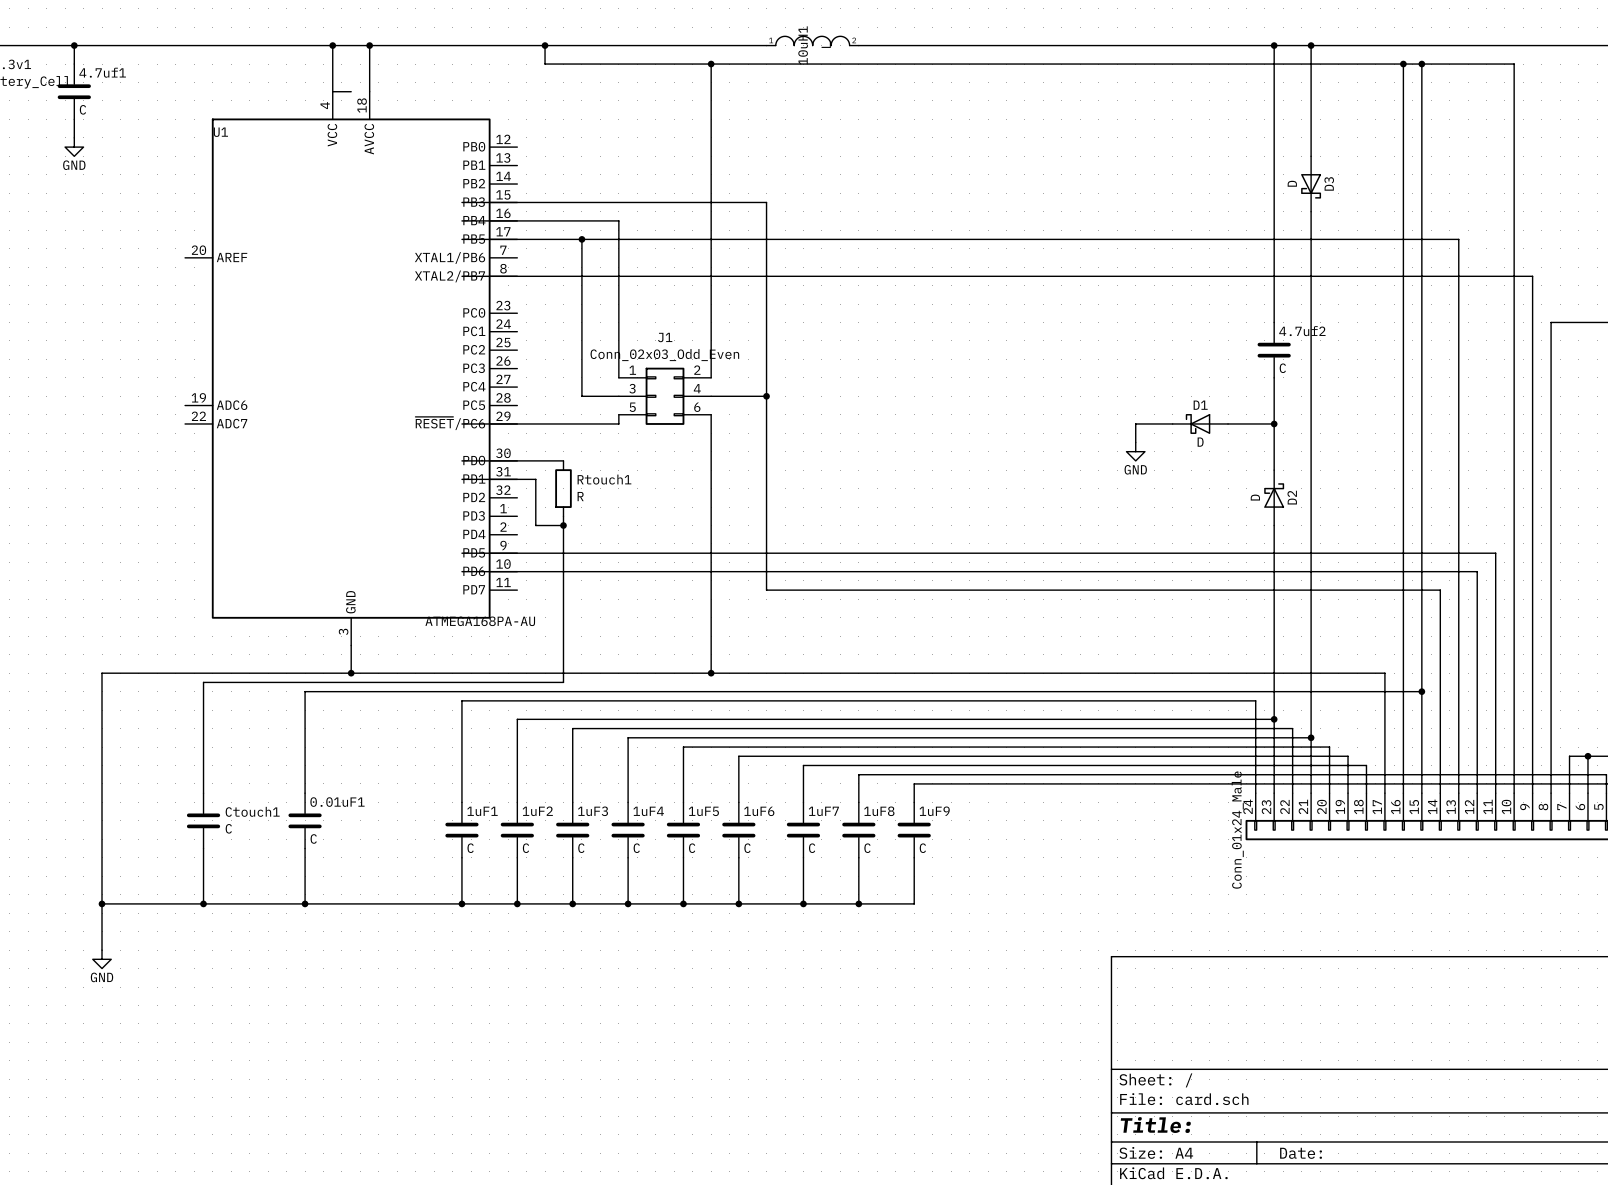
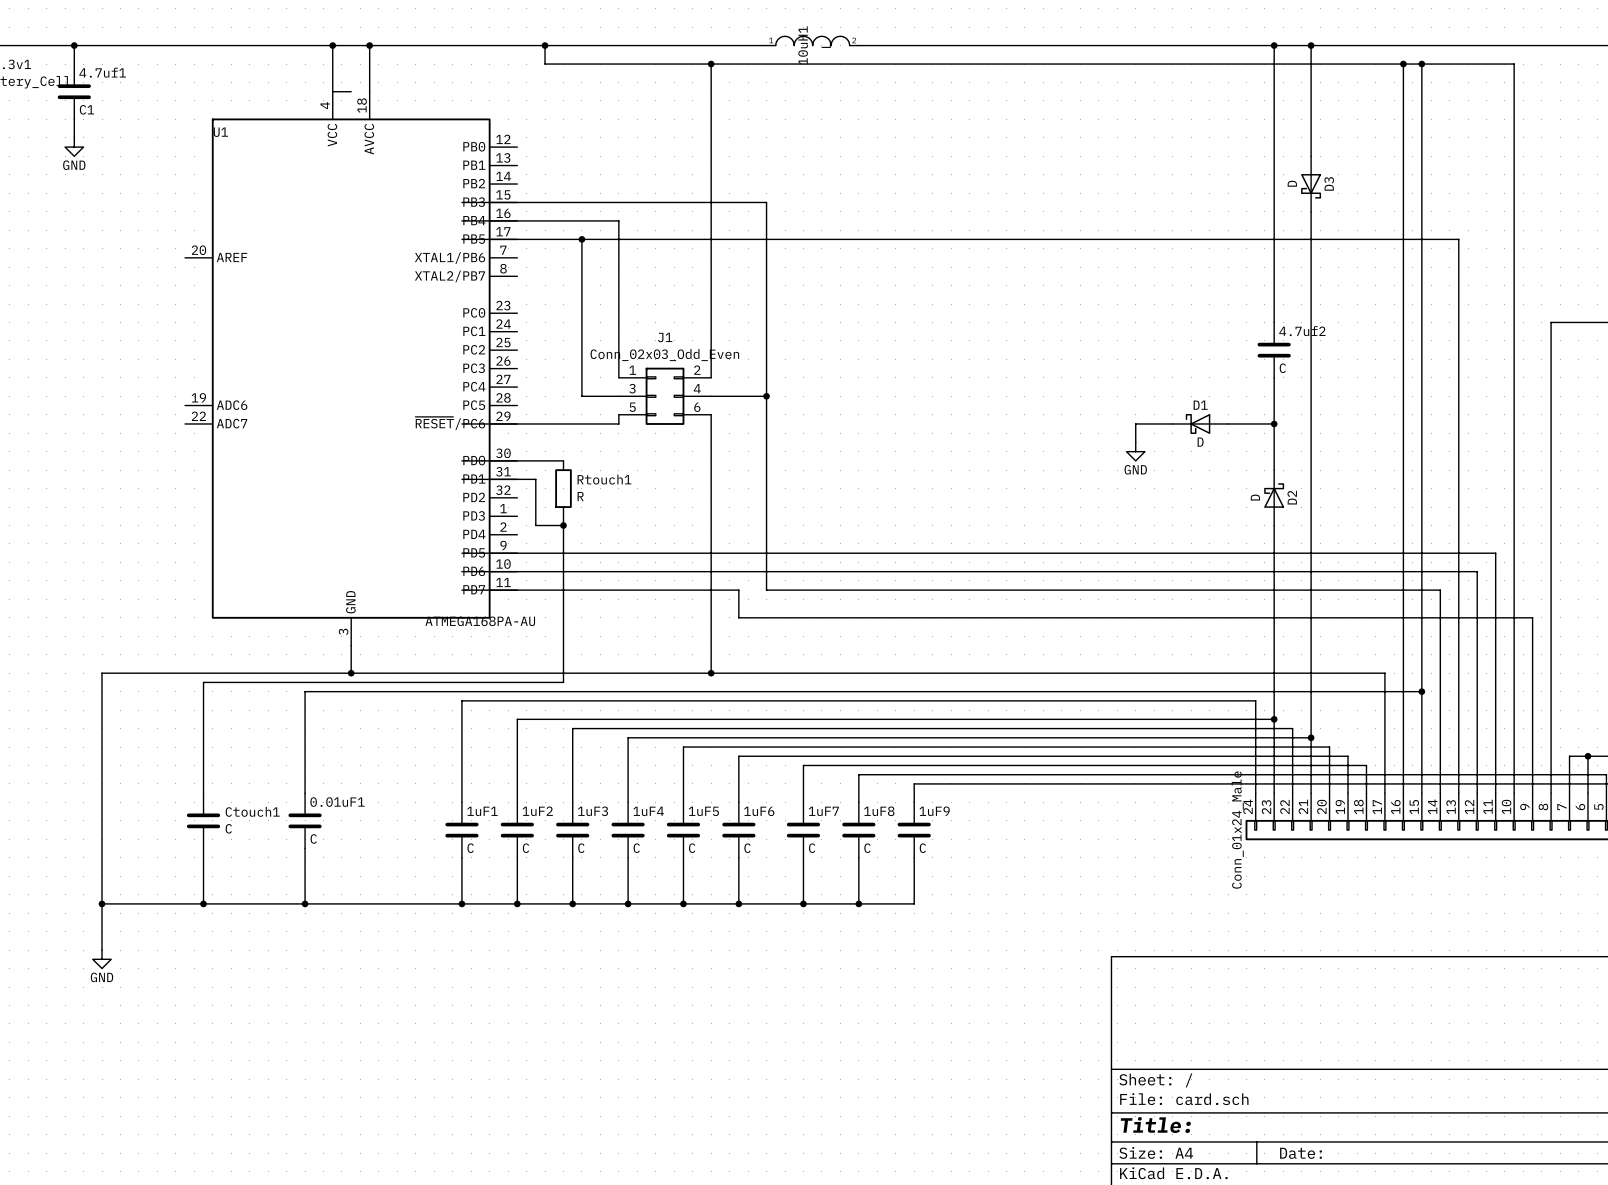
C name: C (82, 109) -> C1 (87, 109)
wire: (461, 276) (1532, 276) (1532, 617) -> (461, 590) (738, 590) (738, 617) (1532, 617)

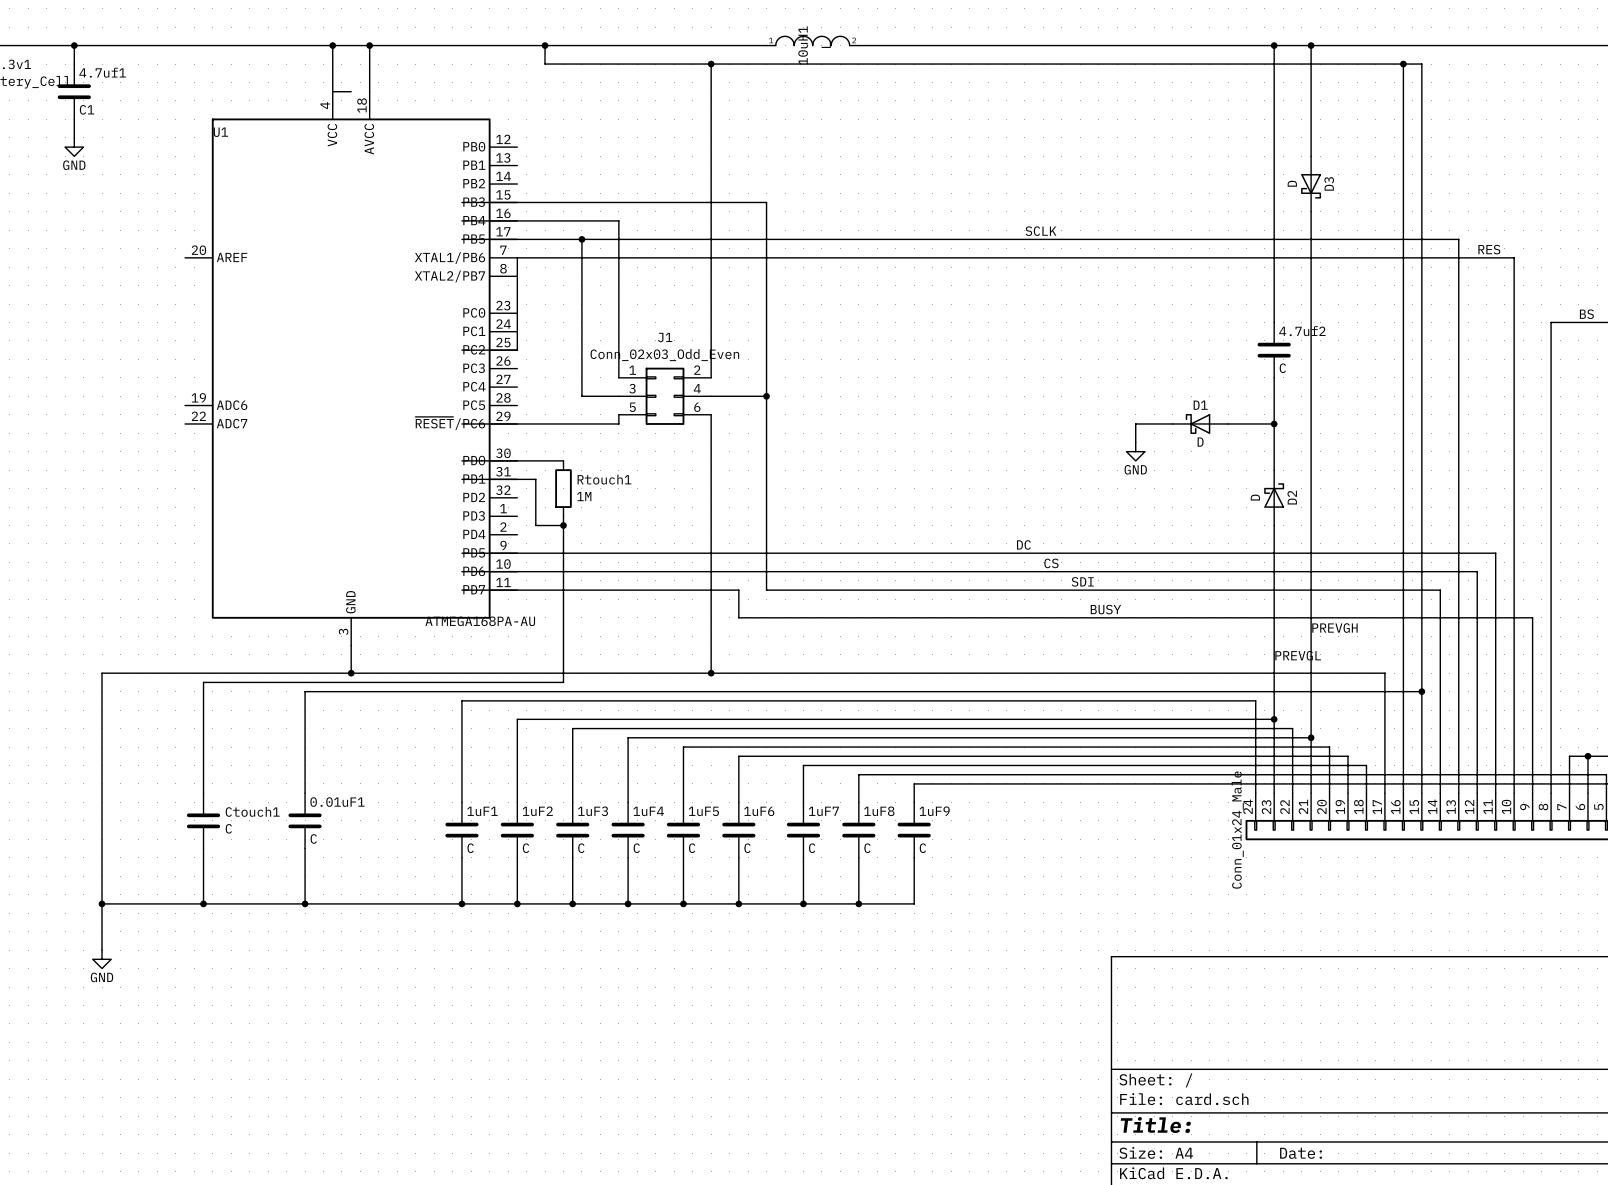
wire: (1421, 64) (1514, 64) (1514, 257) -> (461, 350) (517, 350) (517, 257) (1514, 257)
junction: (1421, 64) -> none
label: none -> SCLK (1040, 231)
label: none -> RES (1489, 249)
label: none -> BS (1586, 314)
Rtouch1 value: R (580, 496) -> 1M (584, 496)
label: none -> DC (1023, 544)
label: none -> CS (1051, 563)
label: none -> SDI (1082, 581)
label: none -> BUSY (1105, 609)
label: none -> PREVGH (1334, 628)
label: none -> PREVGL (1298, 655)

